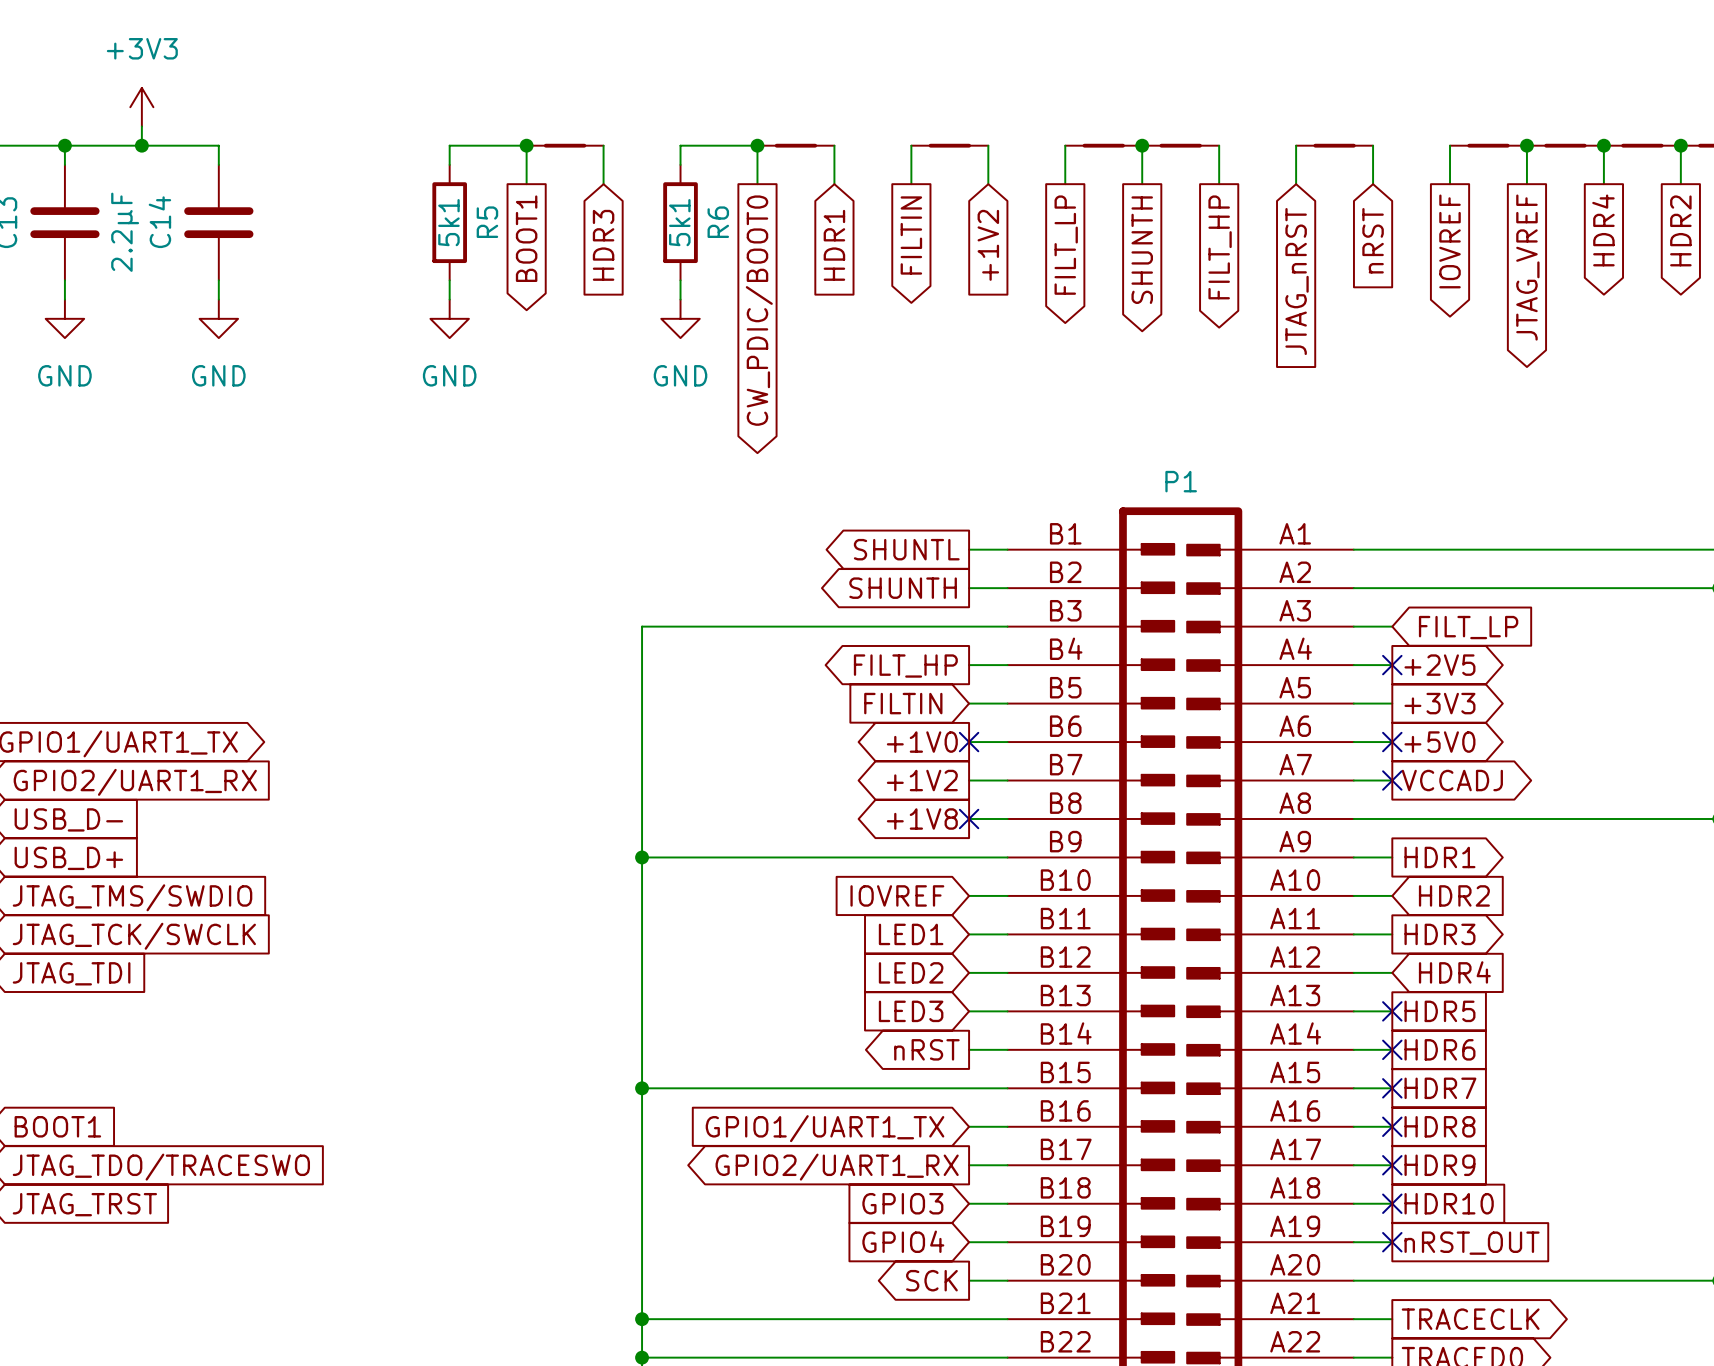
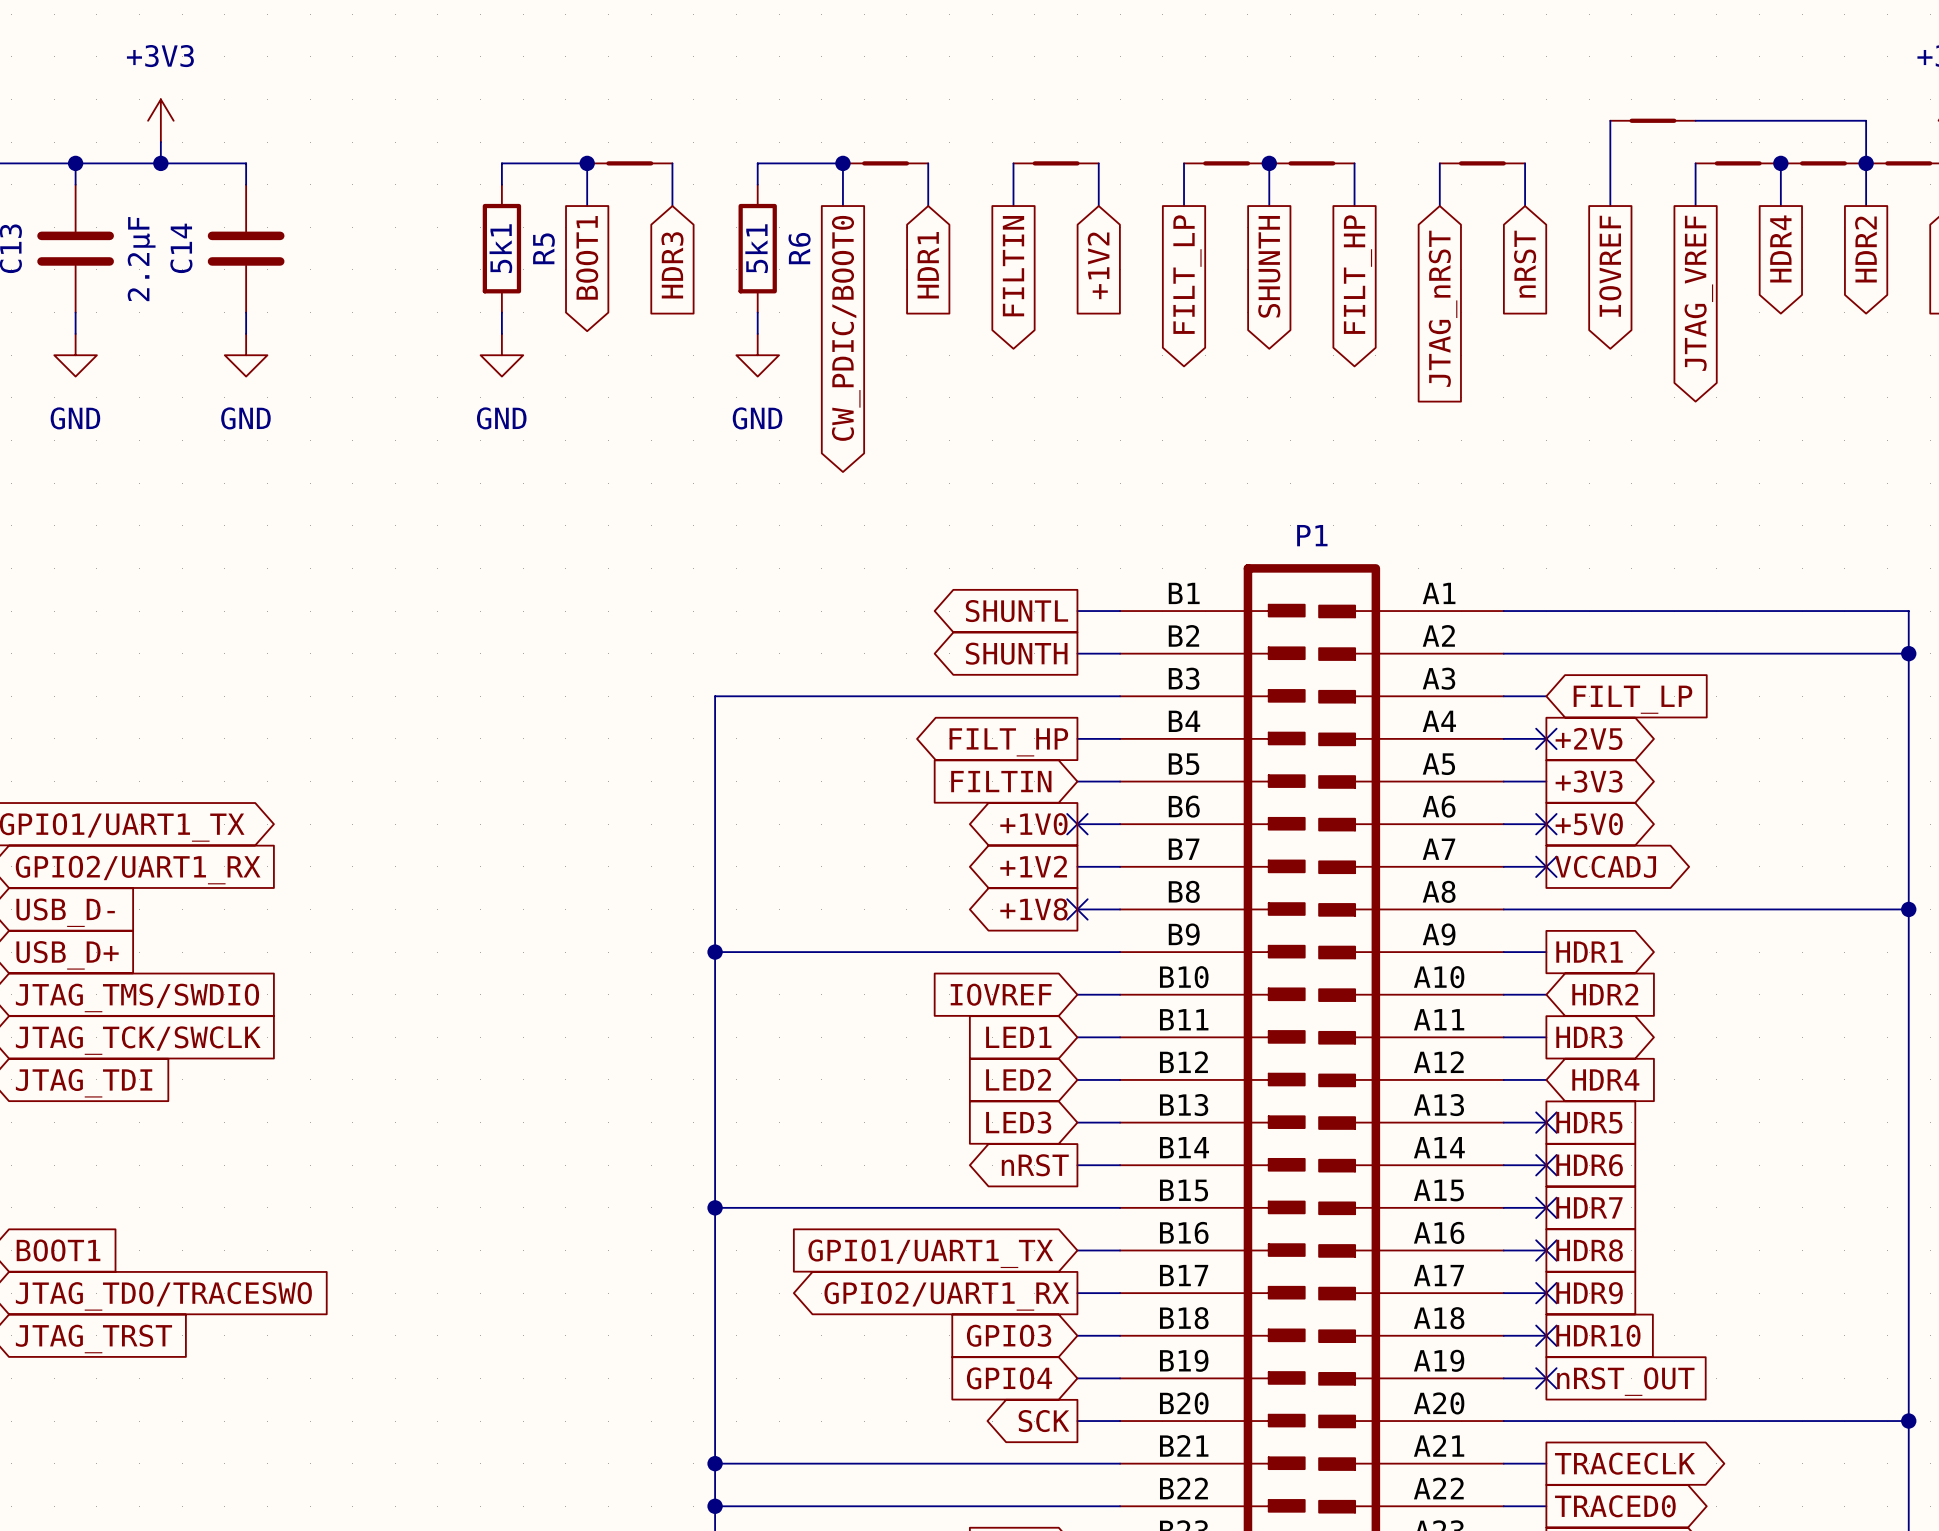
wire: none -> (1610, 120) (1610, 163)
wire: none -> (1695, 120) (1866, 120) (1866, 163)
part position: (1488, 145) -> (1652, 120)
junction: (1526, 145) -> none

